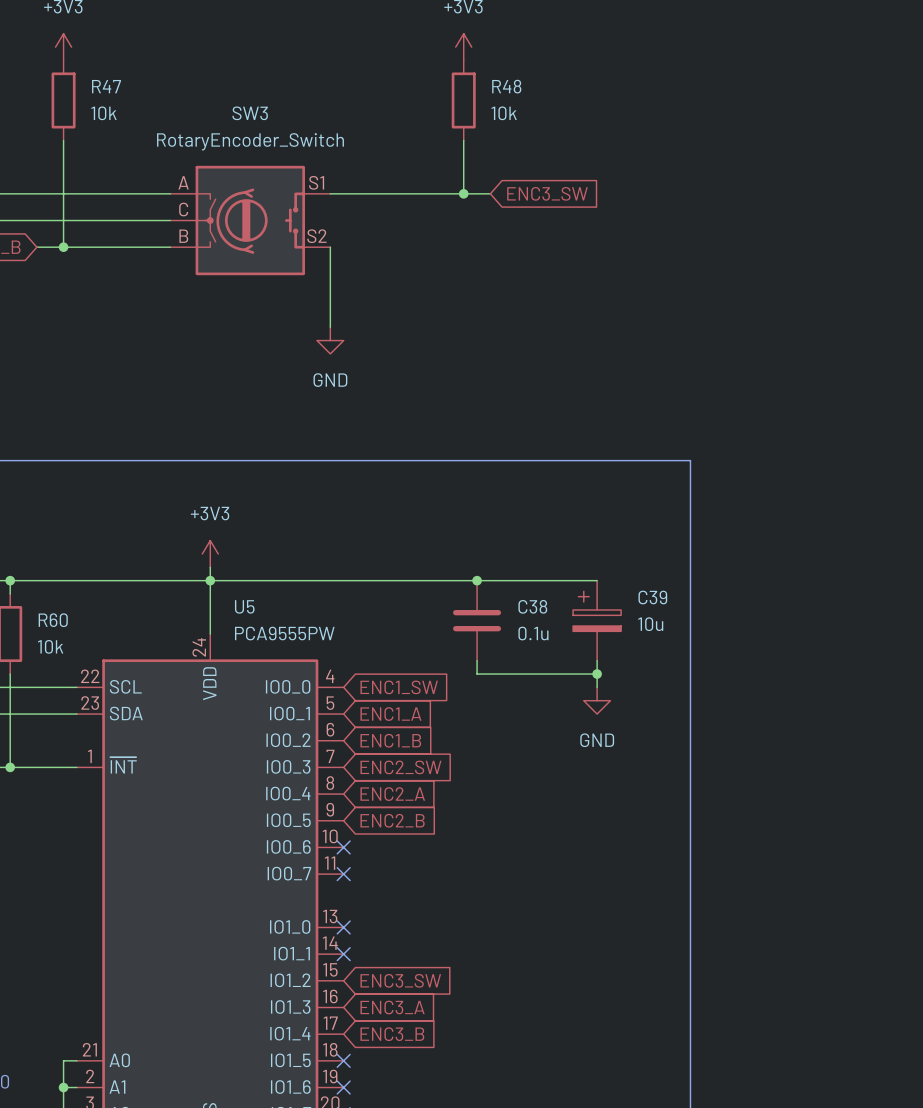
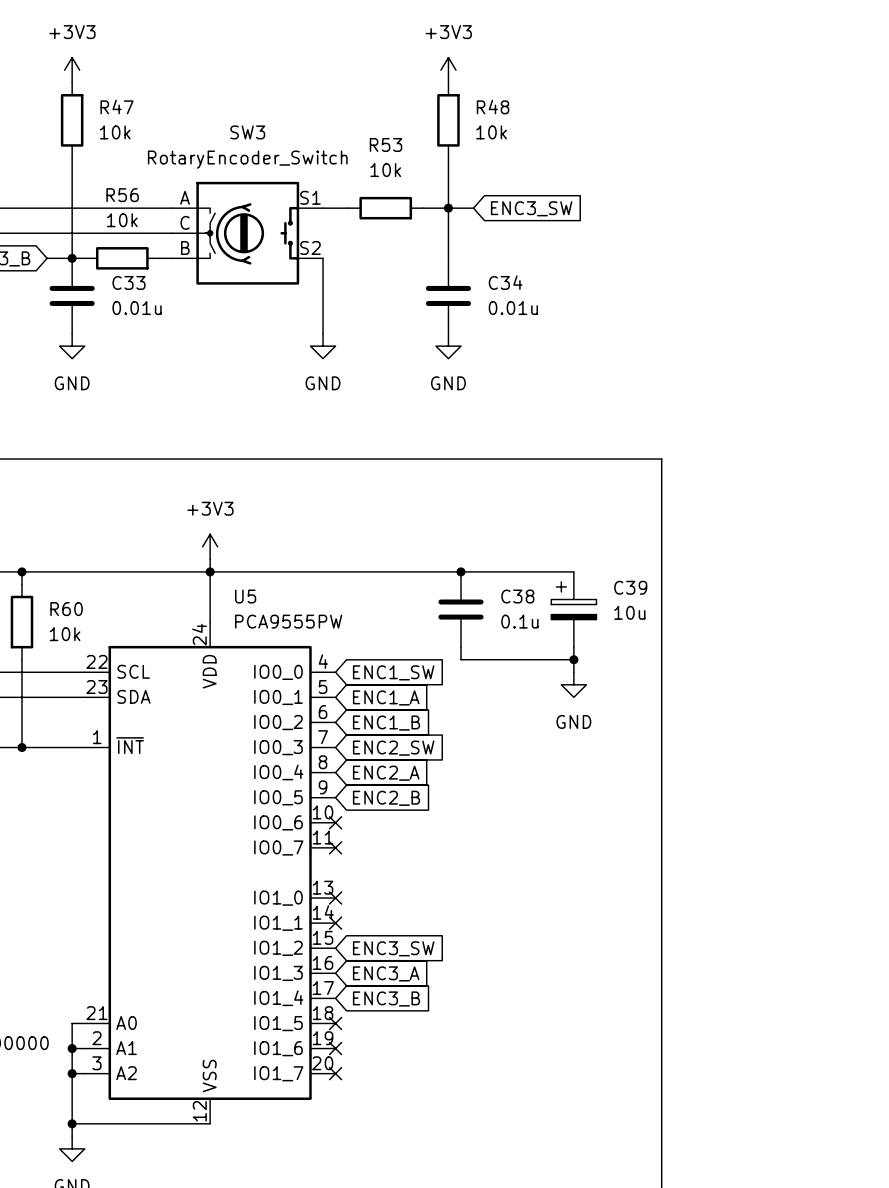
wire: (357, 193) (437, 193) -> none
R53: none -> 10k (385, 208)
wire: none -> (448, 208) (448, 258)
wire: (76, 247) (156, 247) -> none
R56: none -> 10k (122, 258)
C33: none -> 0.01u (72, 295)
C34: none -> 0.01u (448, 295)
power symbol: none -> GND (72, 346)
power symbol: none -> GND (448, 346)

